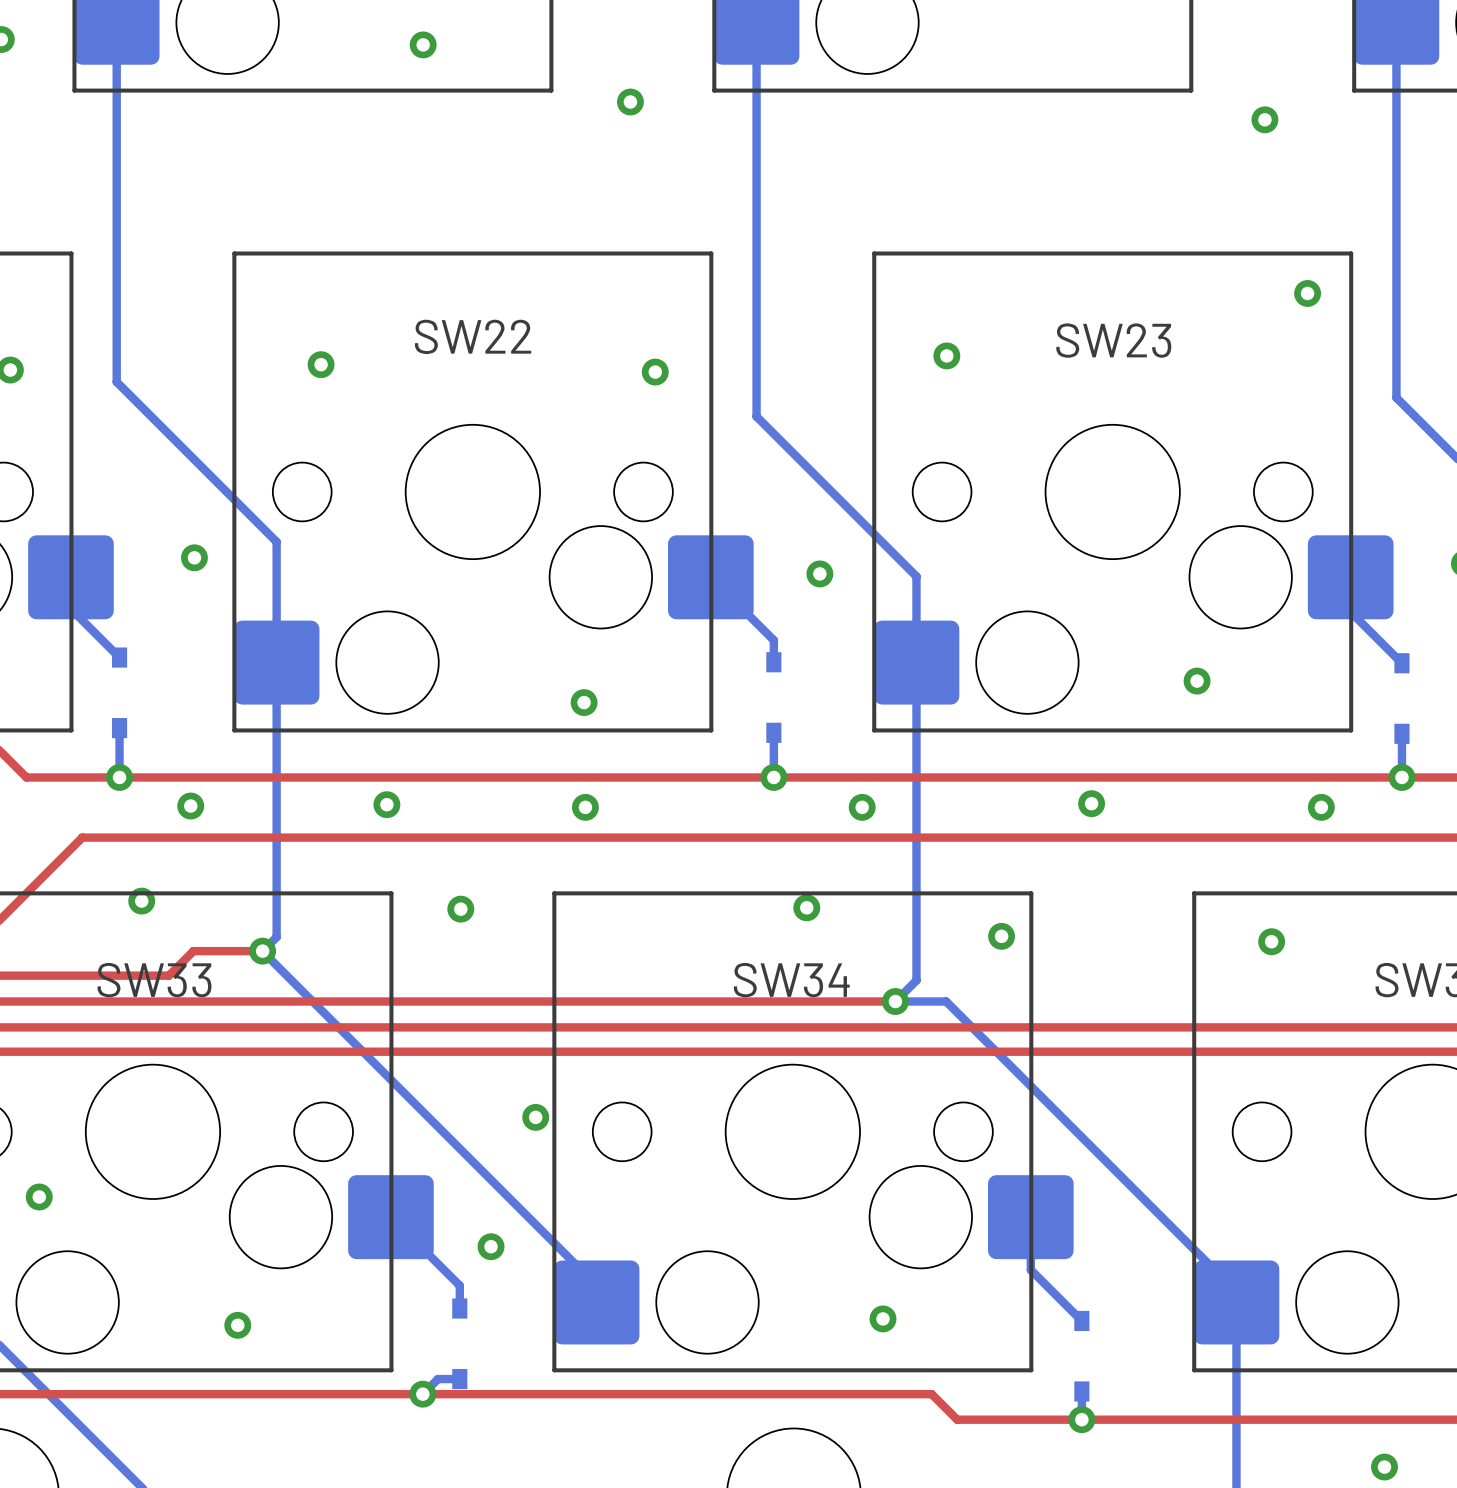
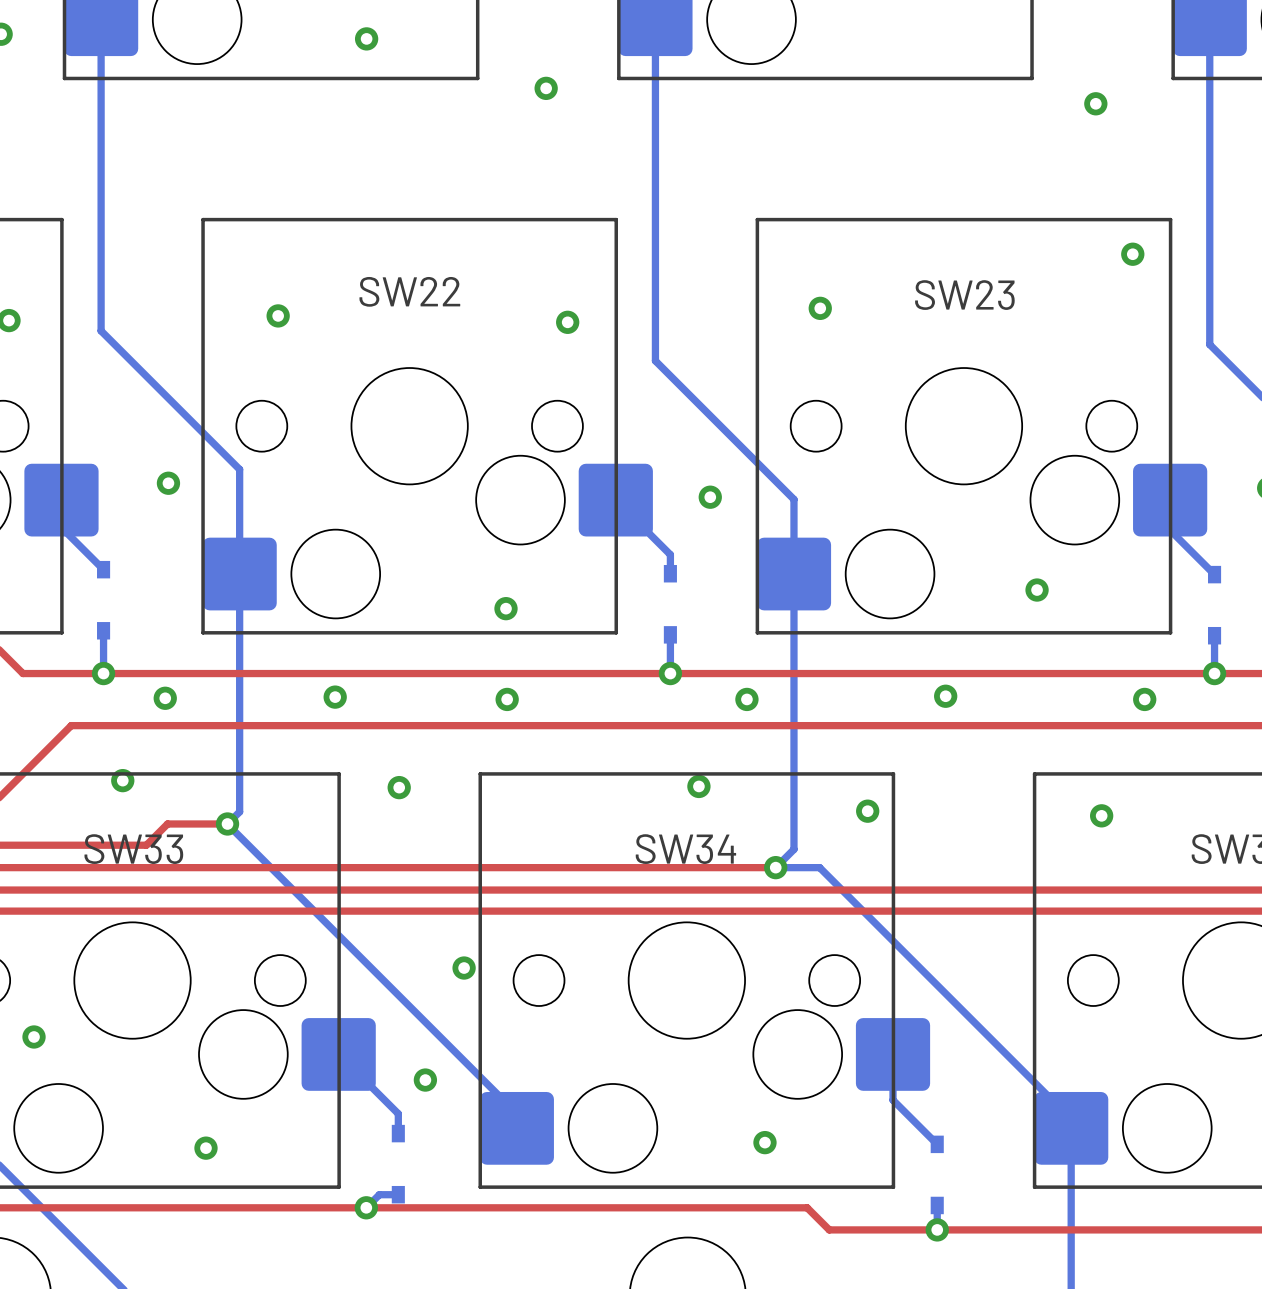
via: (1384, 1467) -> none

